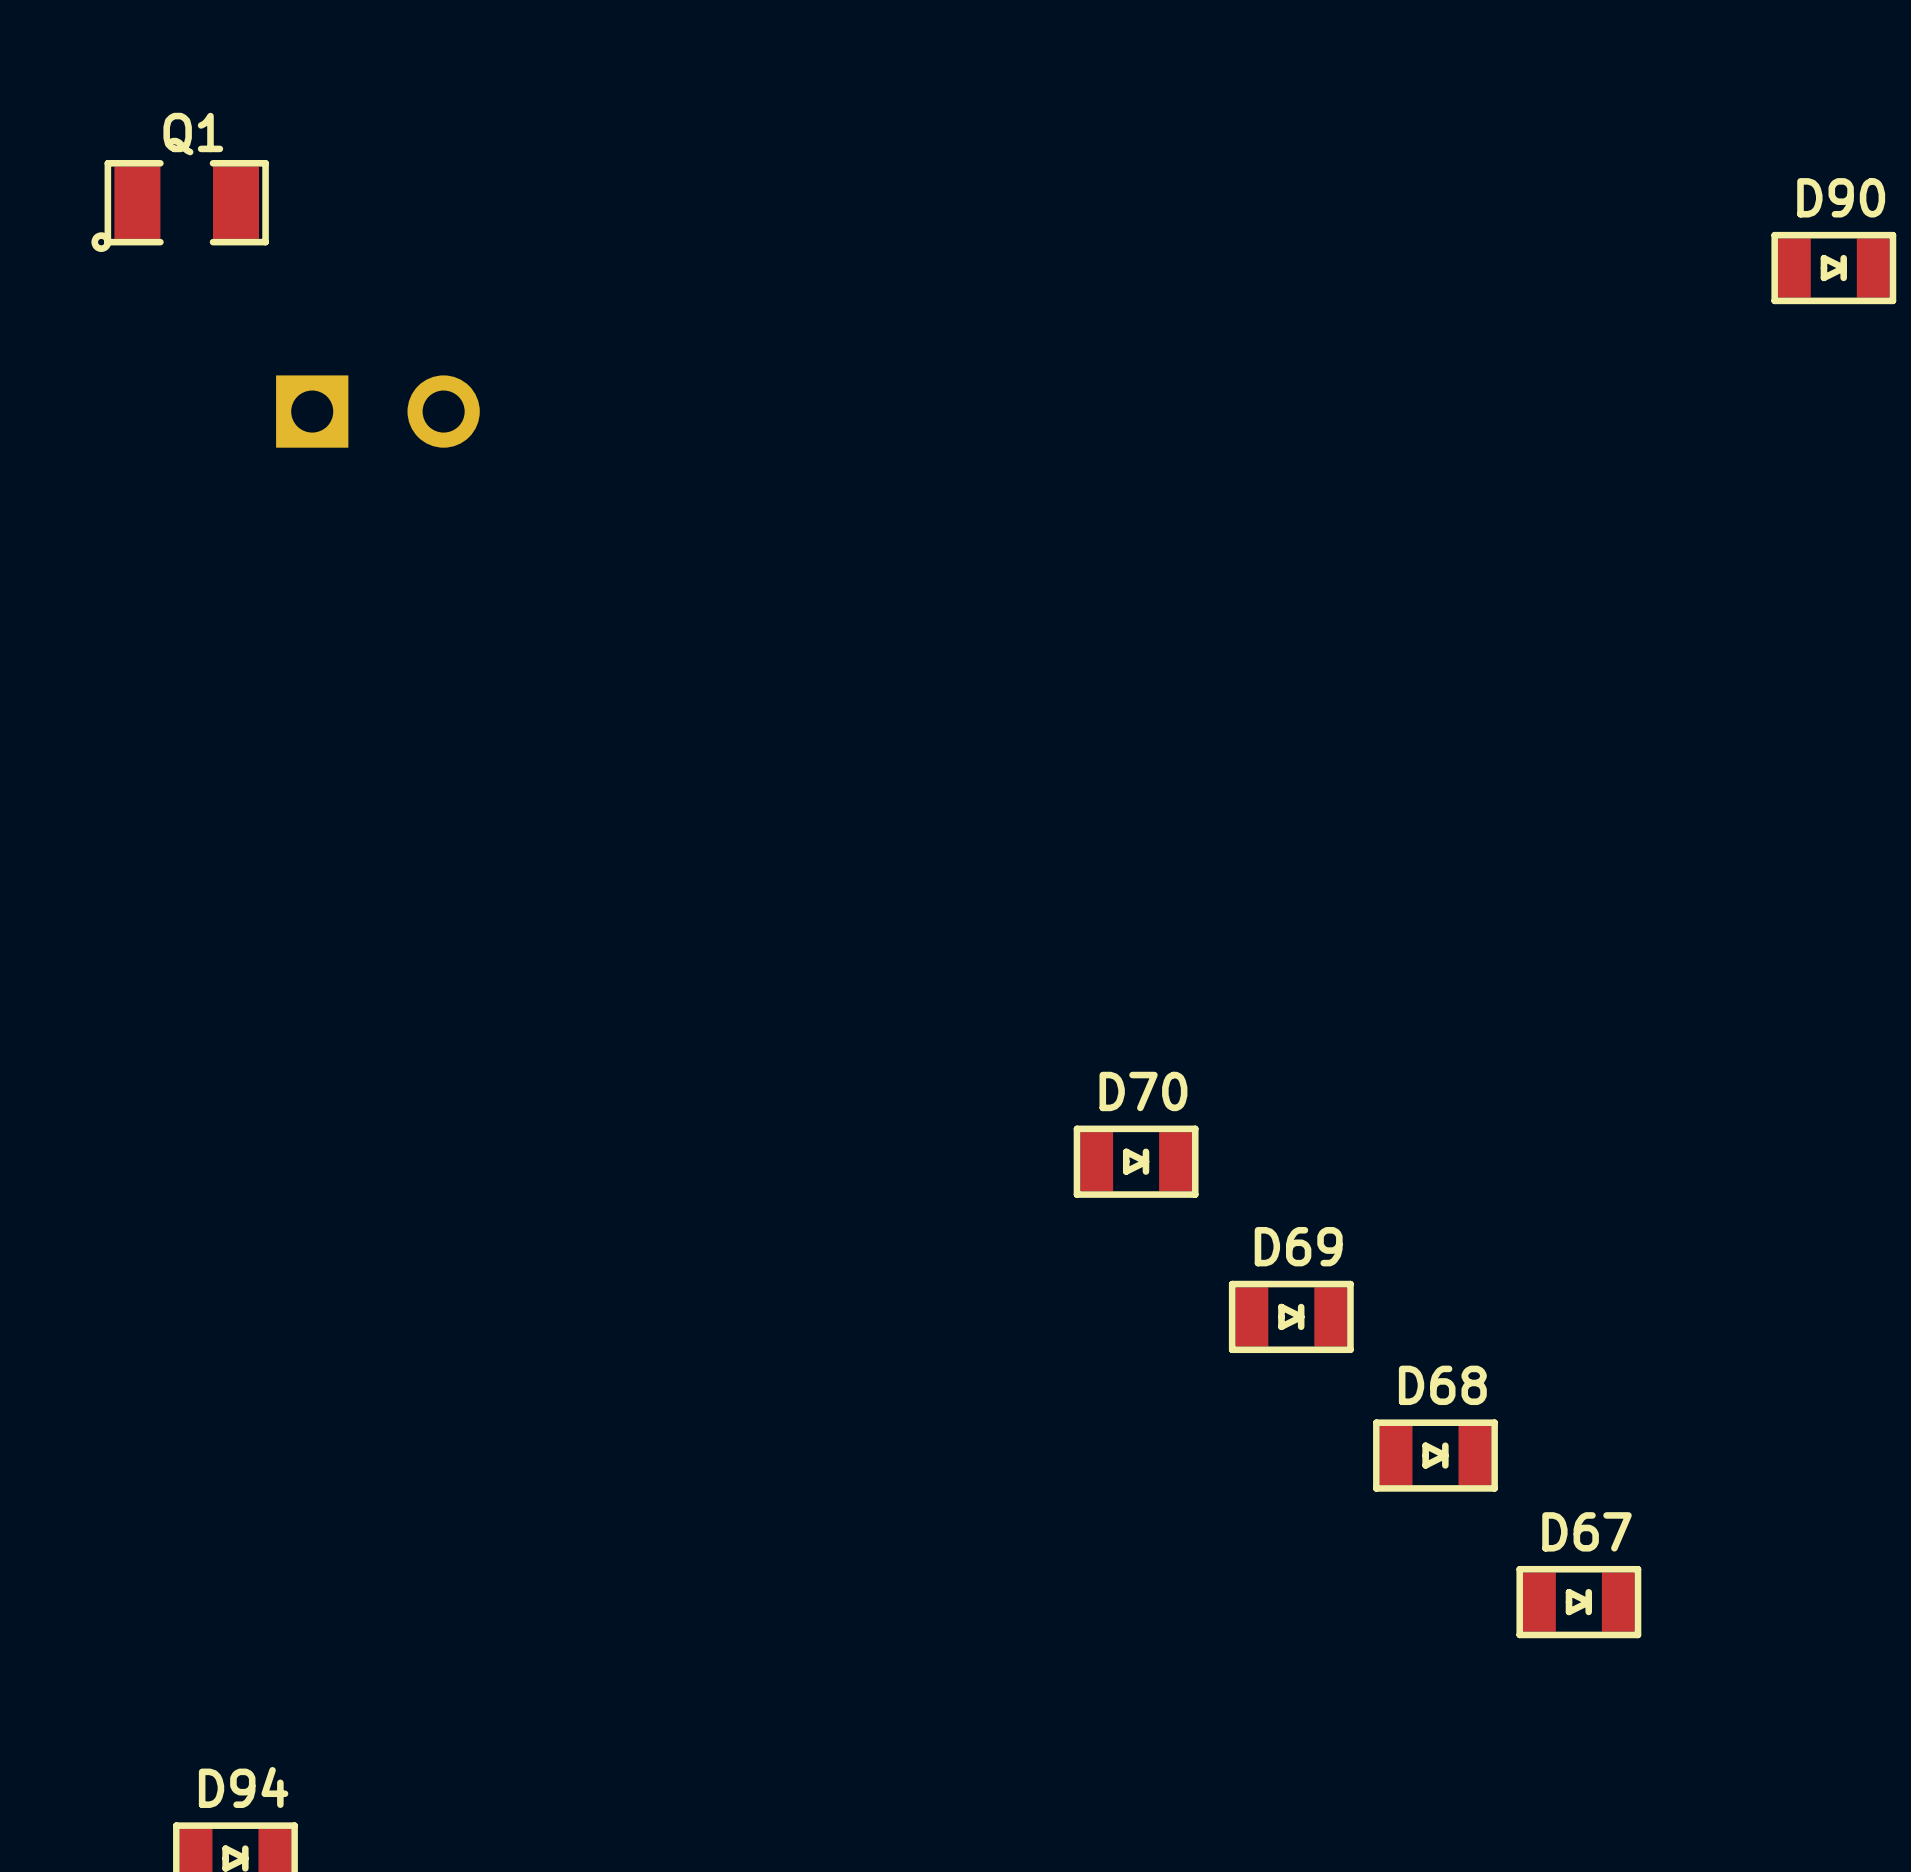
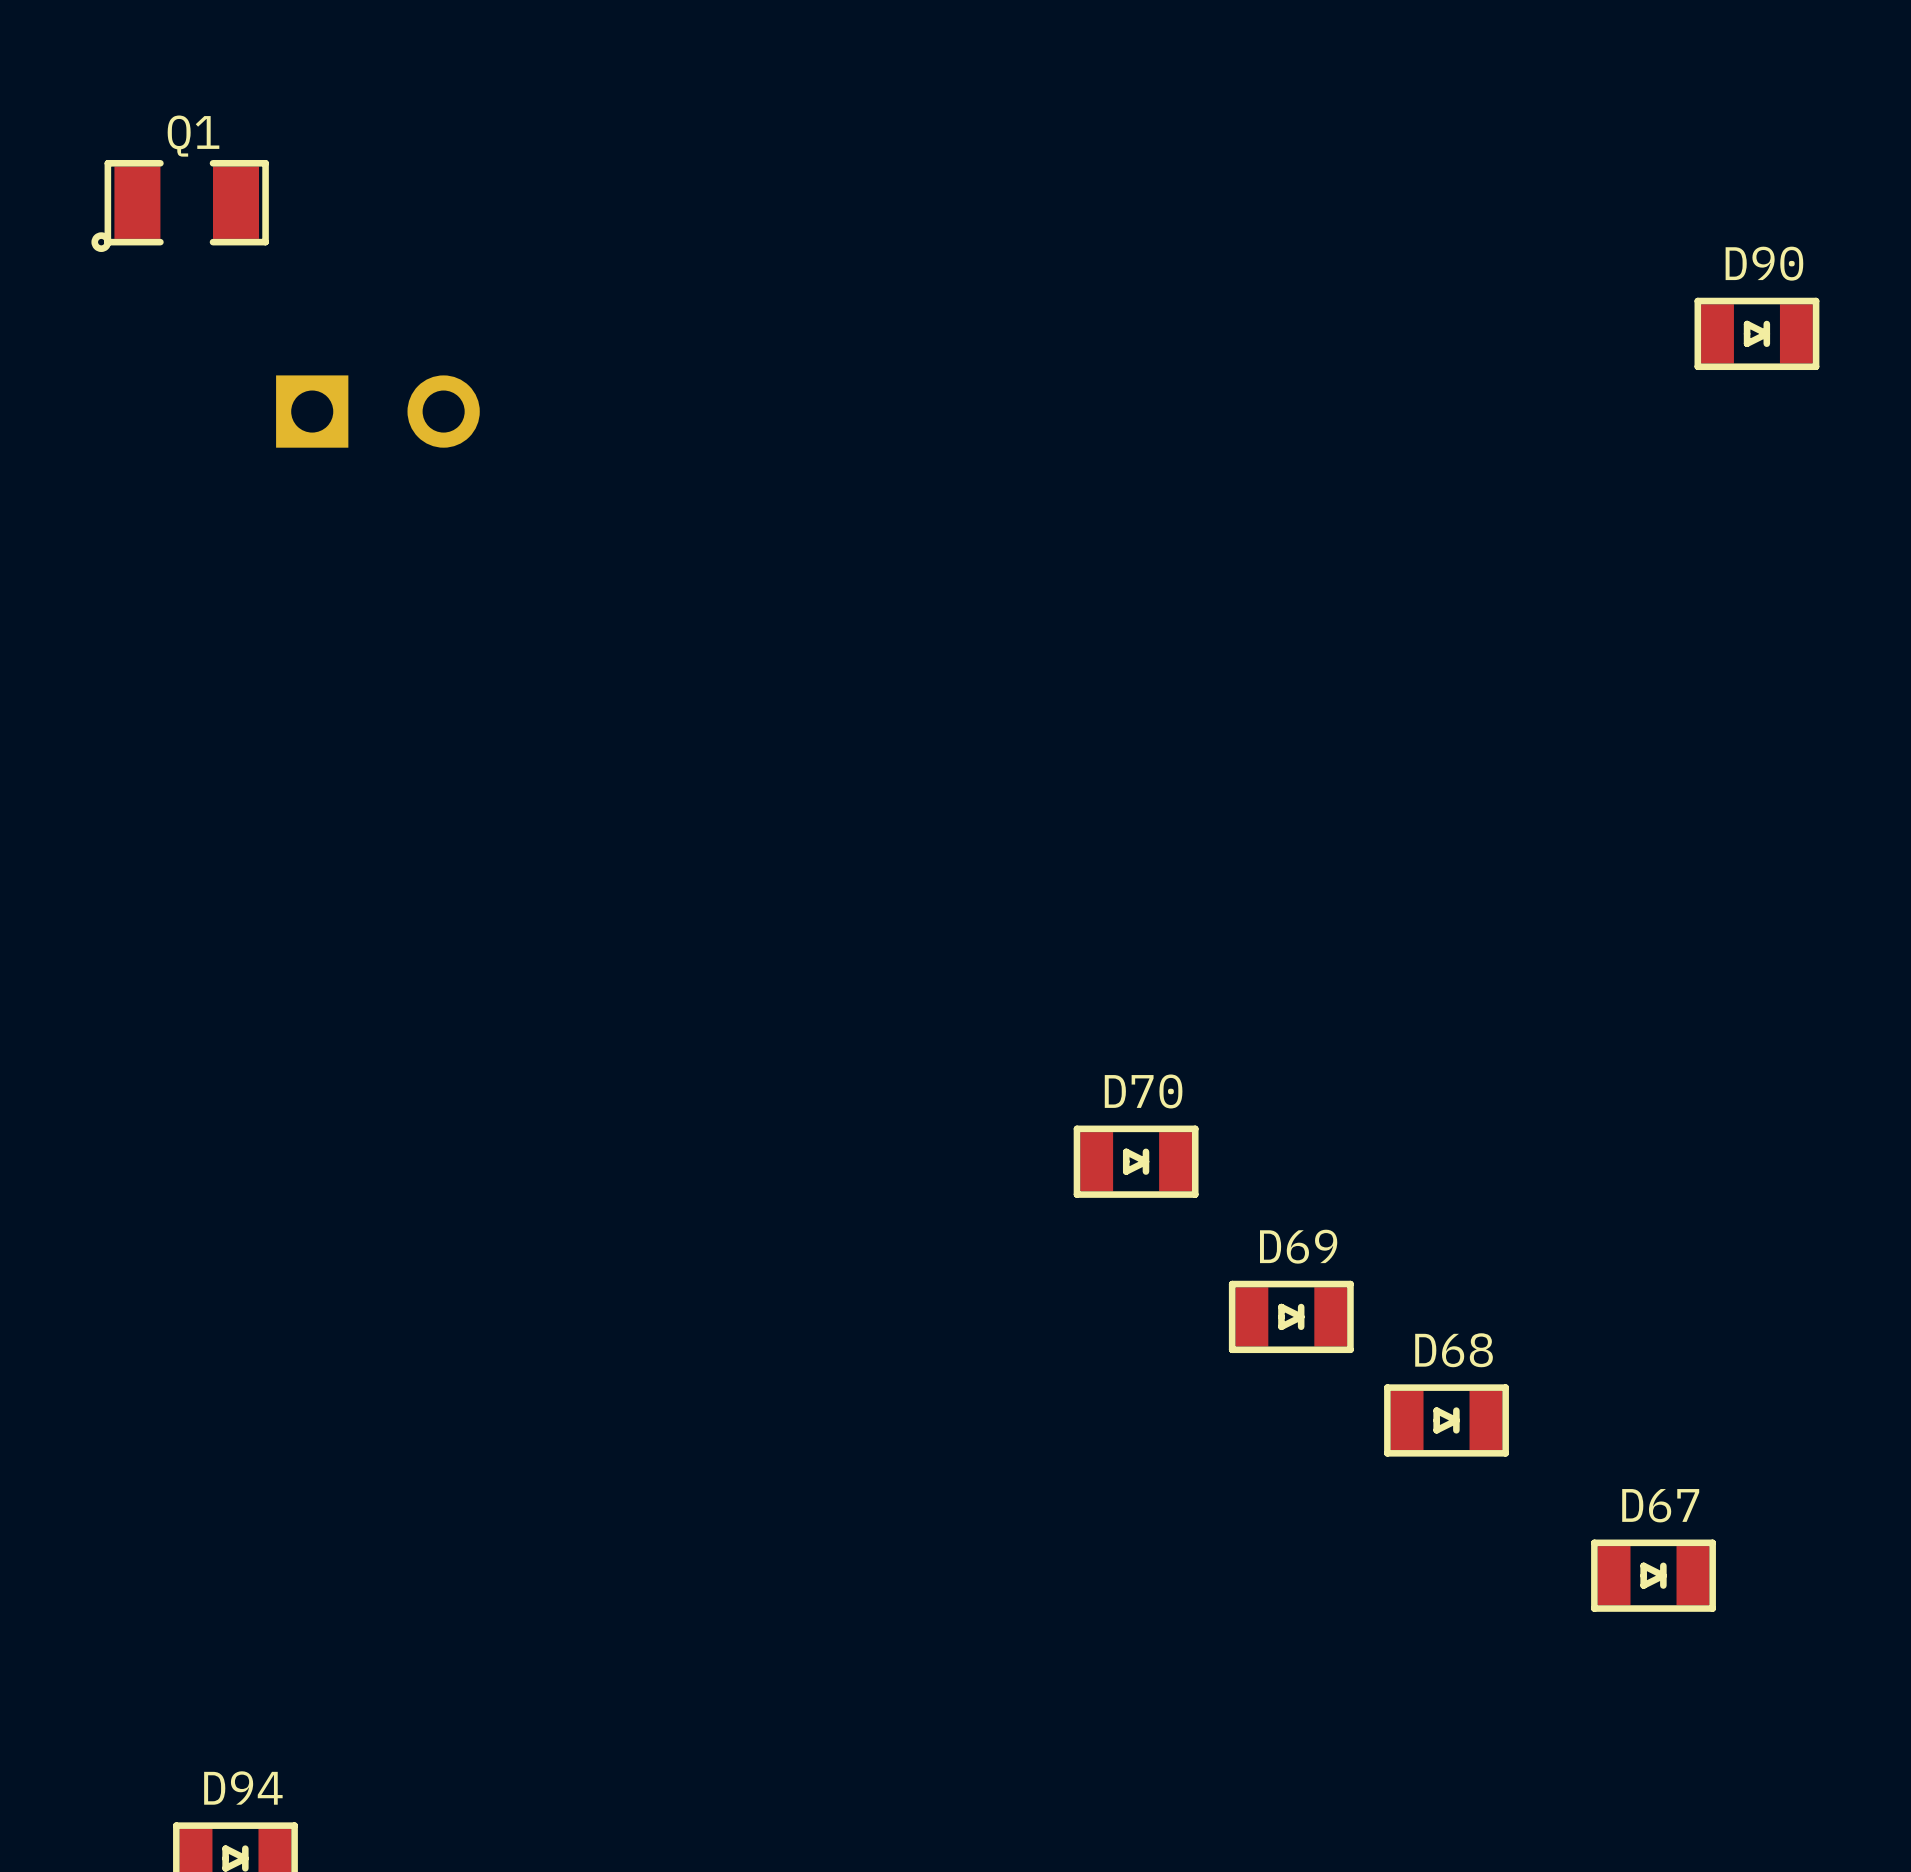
D90 position: (1833, 268) -> (1756, 333)
D68 position: (1435, 1455) -> (1446, 1420)
D67 position: (1578, 1602) -> (1653, 1575)

